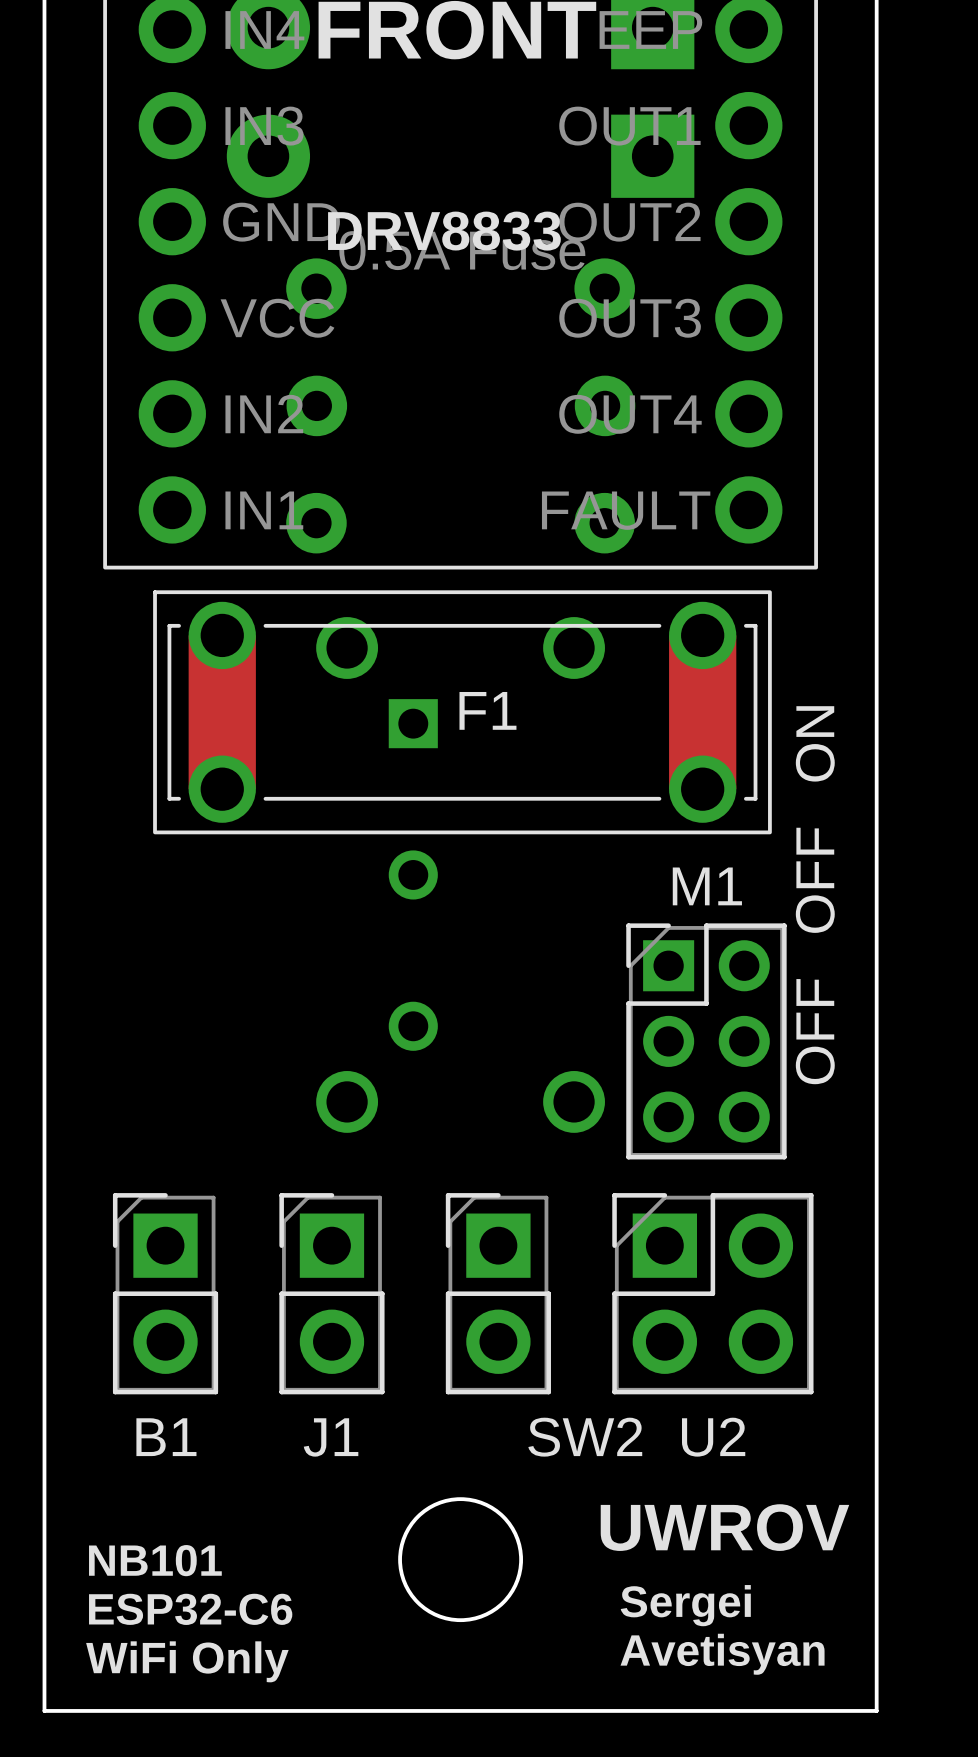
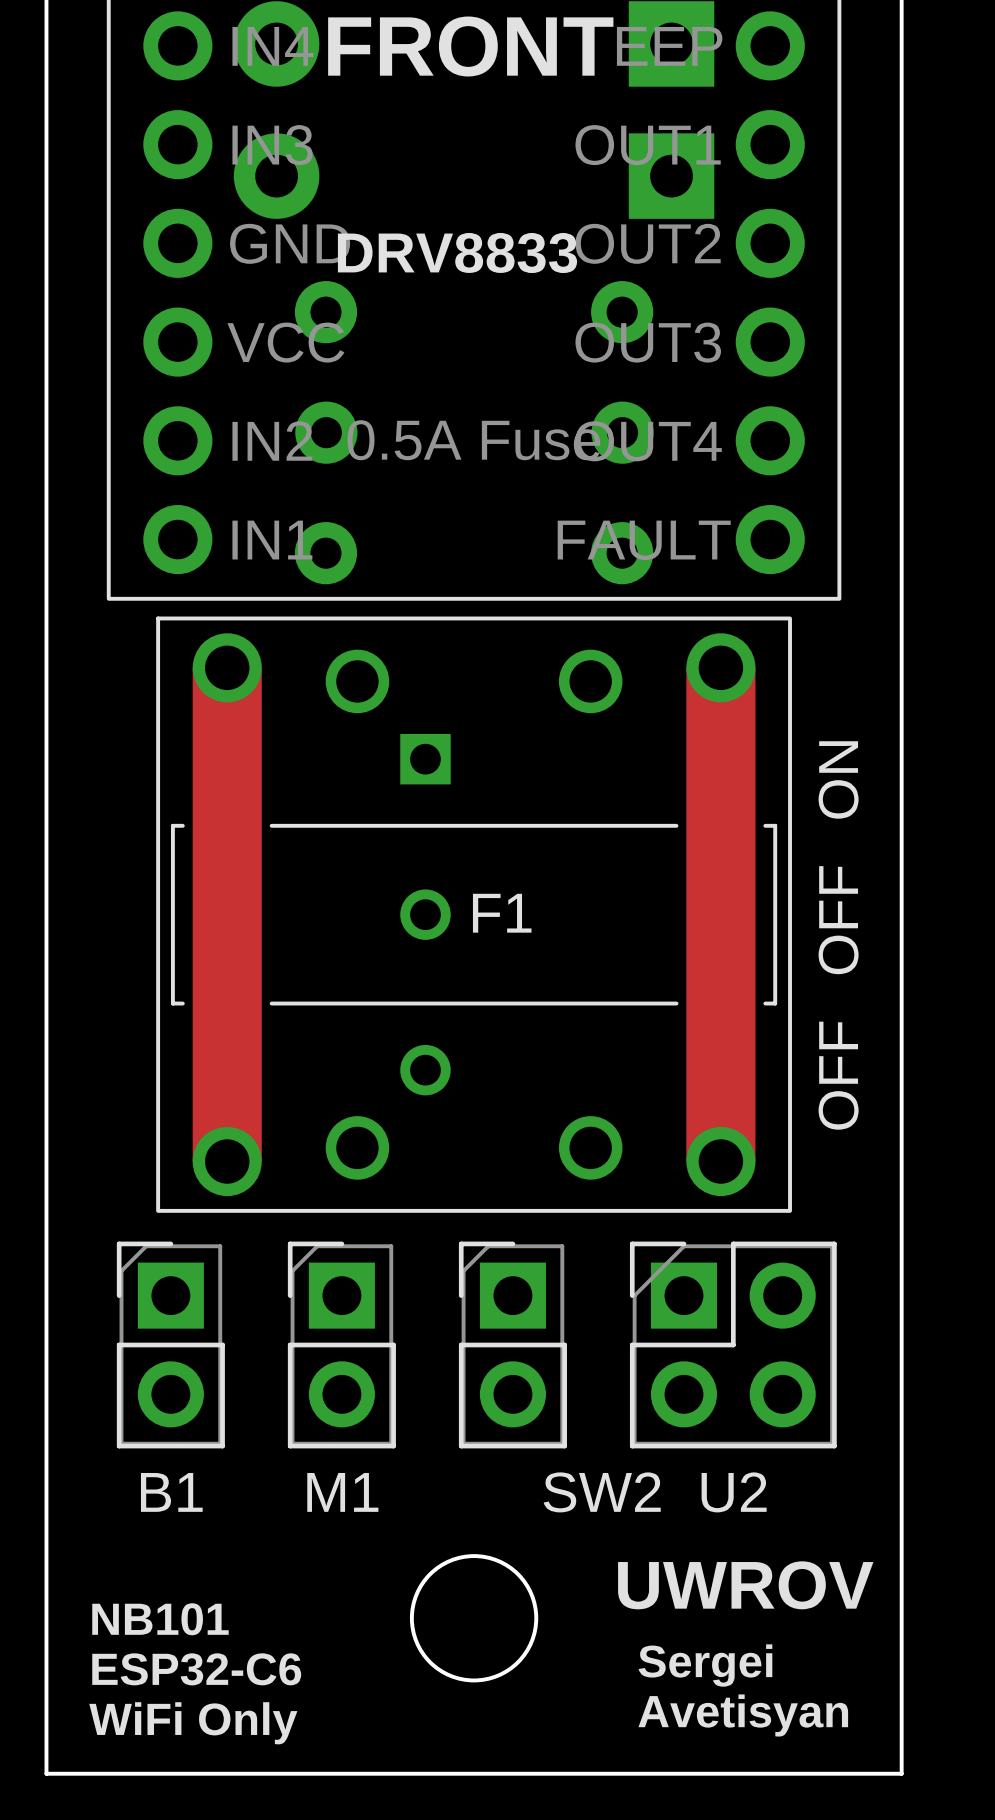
F1 footprint: [153, 590, 772, 835] -> [156, 616, 792, 1213]
M1: (706, 1041) -> none
J1 name: J1 (331, 1437) -> M1 (342, 1492)

